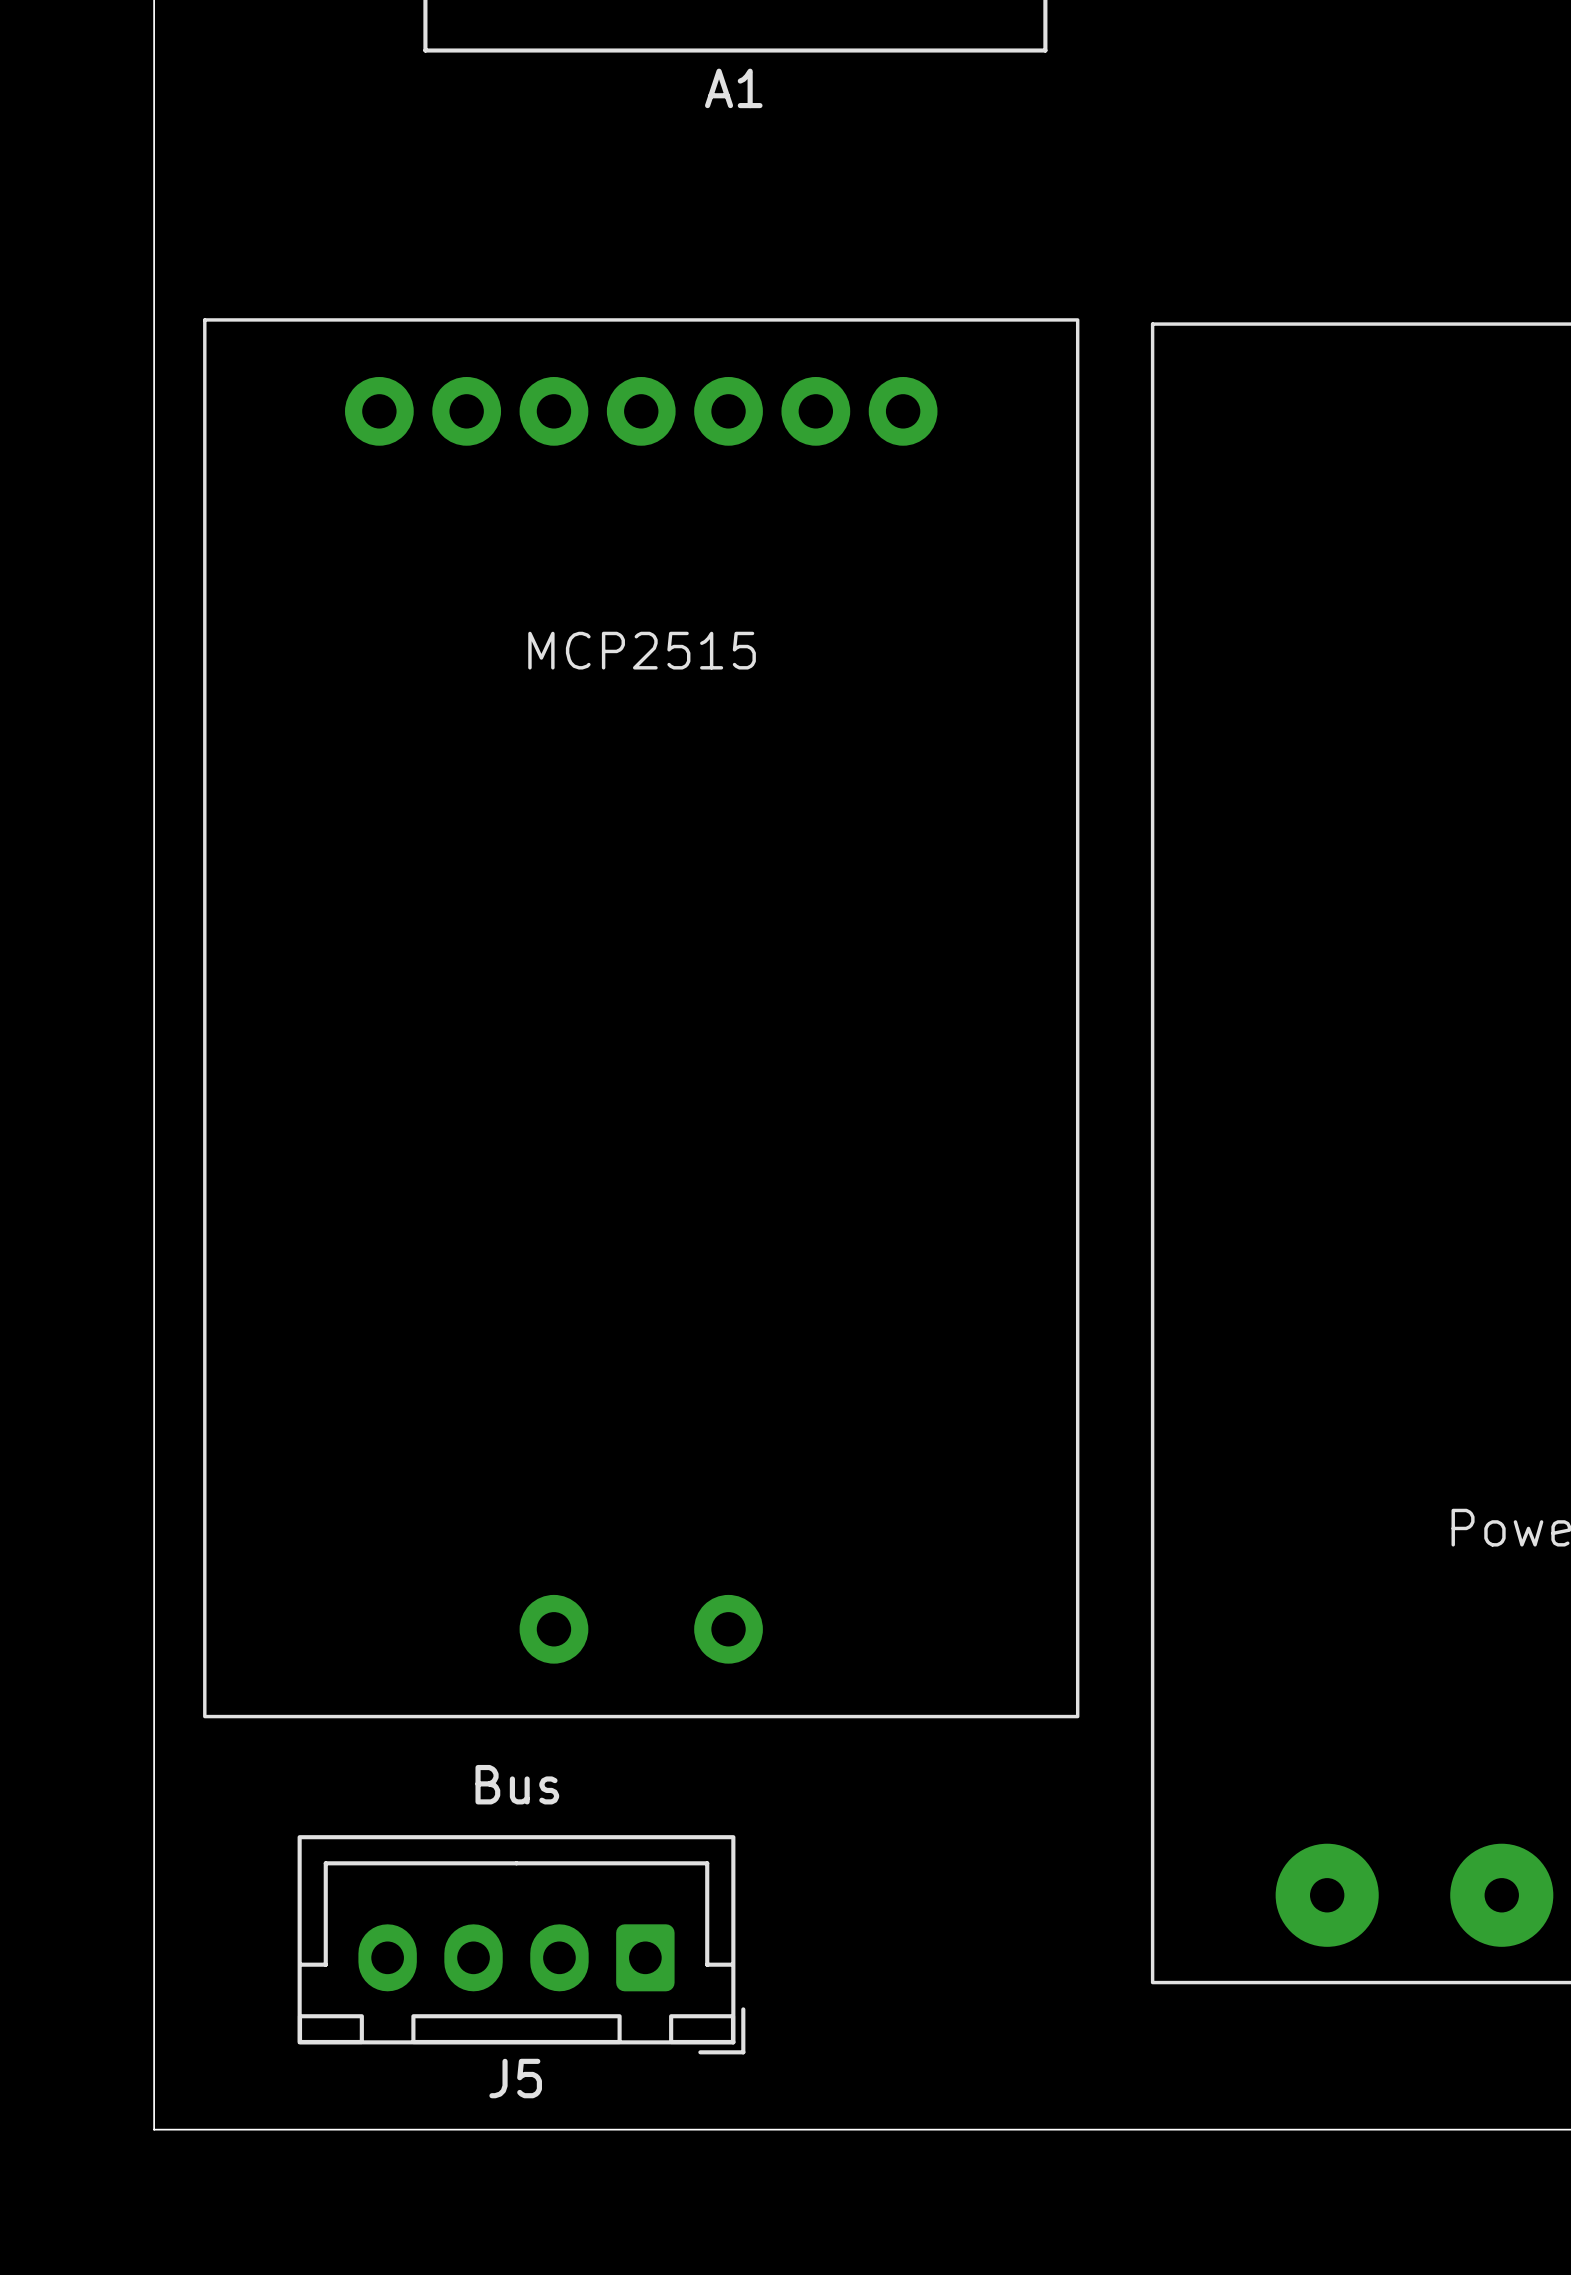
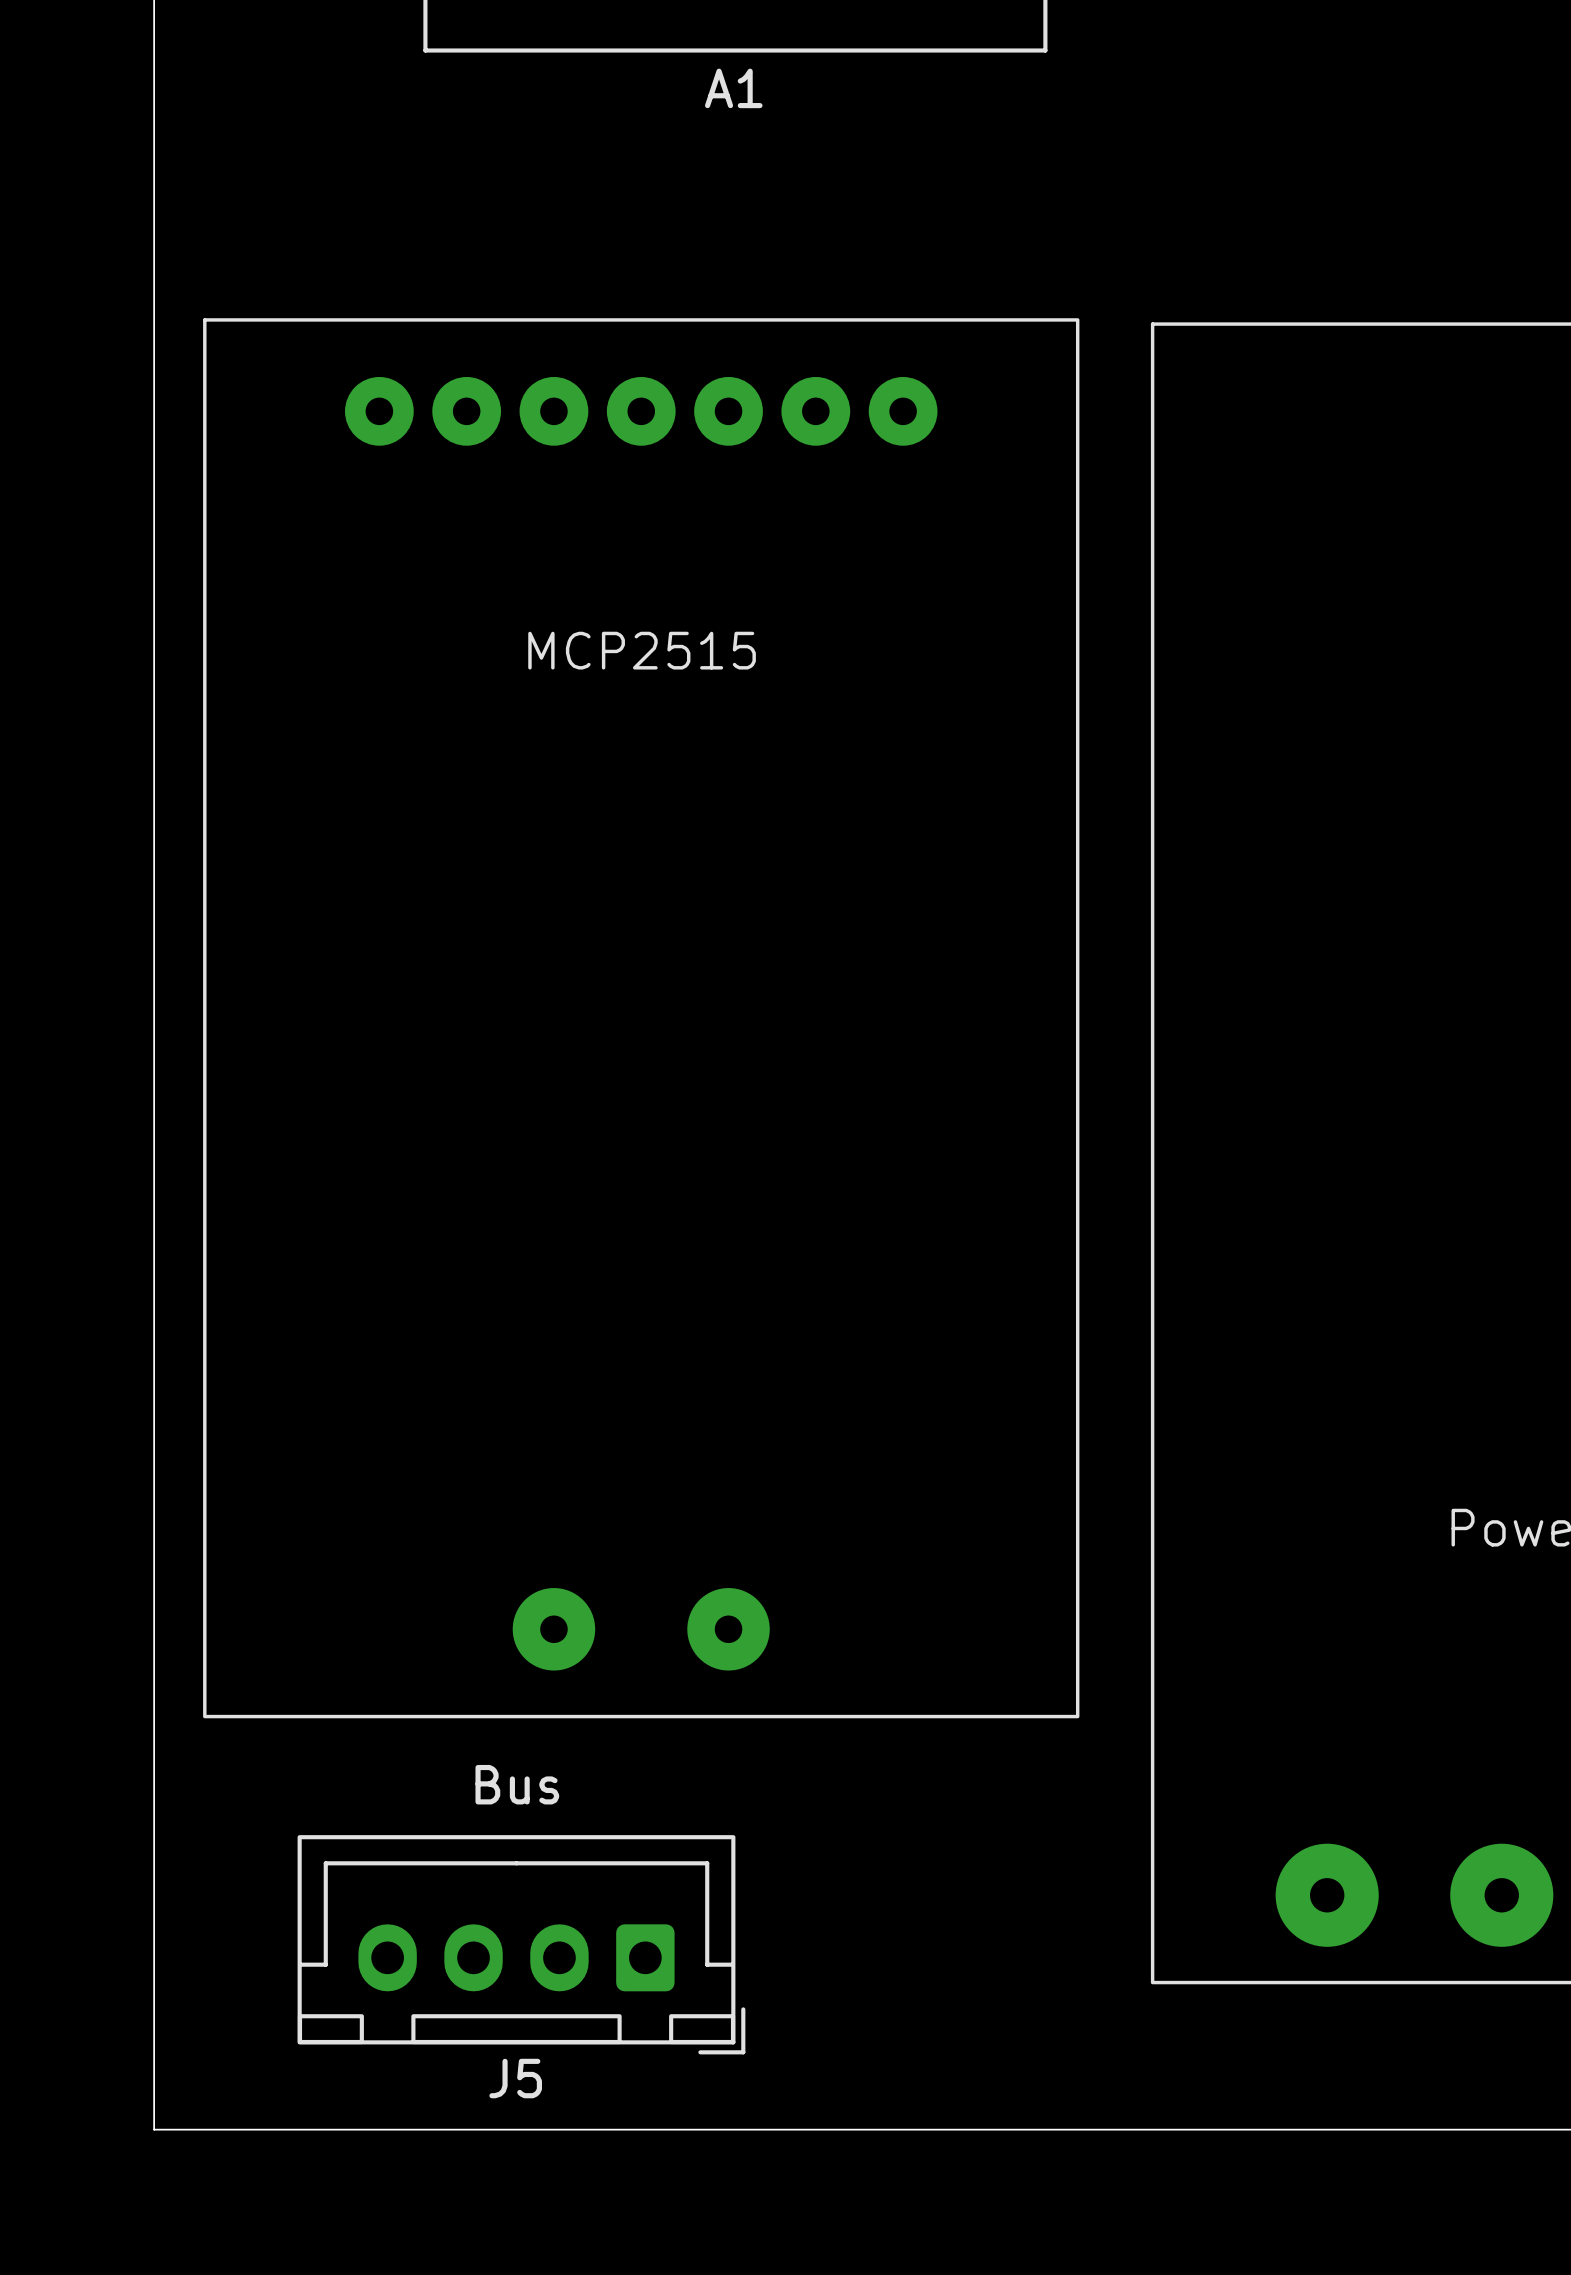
MCP2515 footprint: [203, 318, 1080, 1719] -> [203, 318, 1080, 1719]

